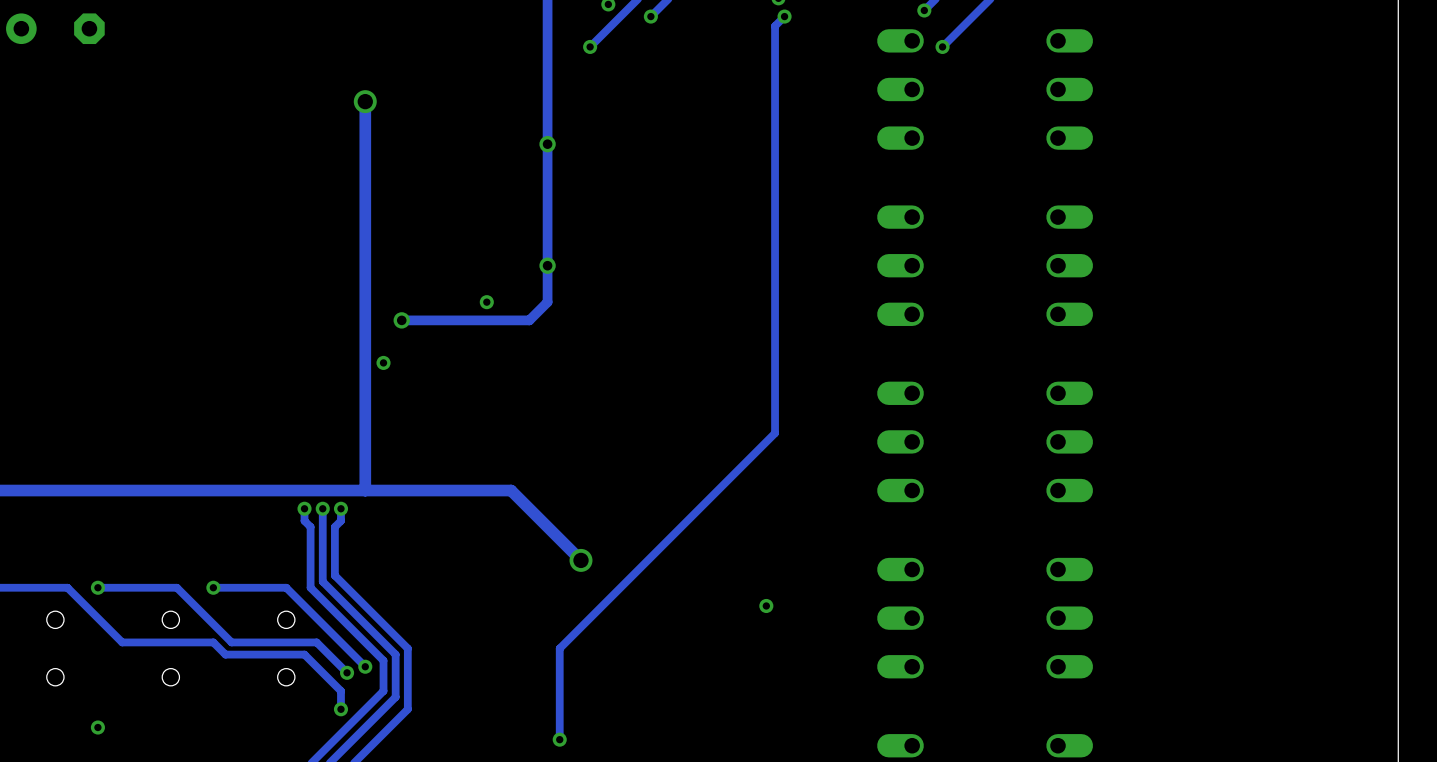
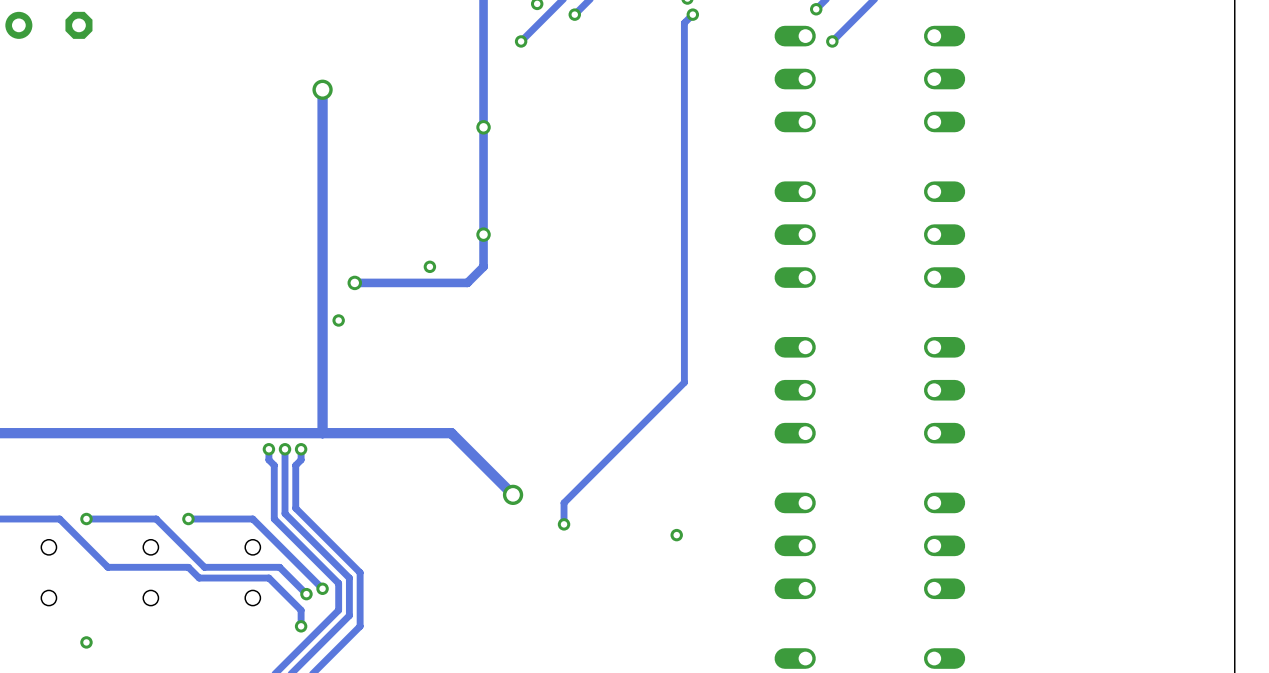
track: (638, 569) (559, 648) (559, 739) -> (564, 502) (564, 524)
via: none -> (564, 524)
via: (559, 739) -> none

